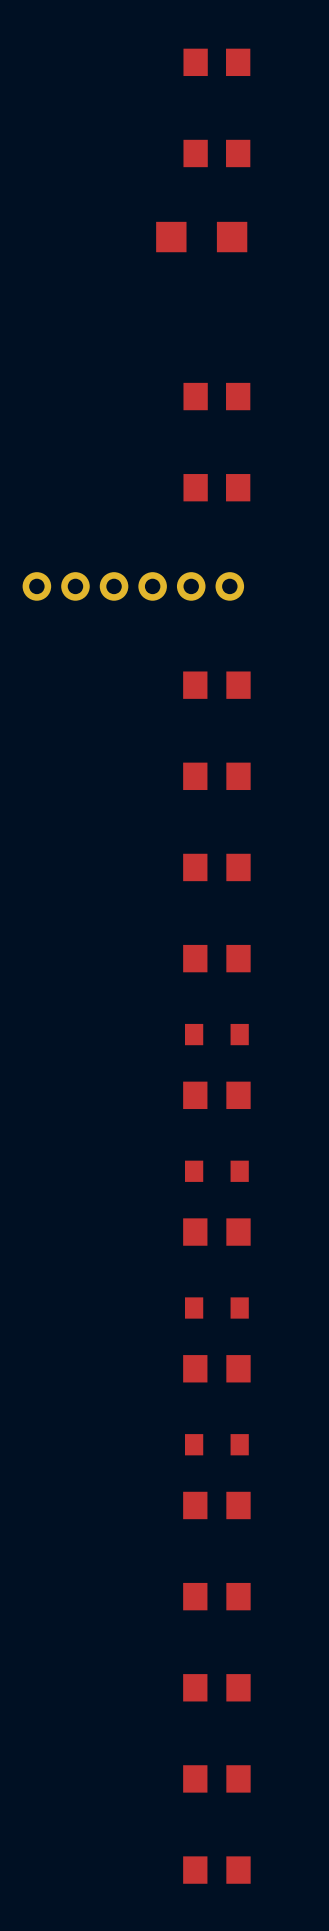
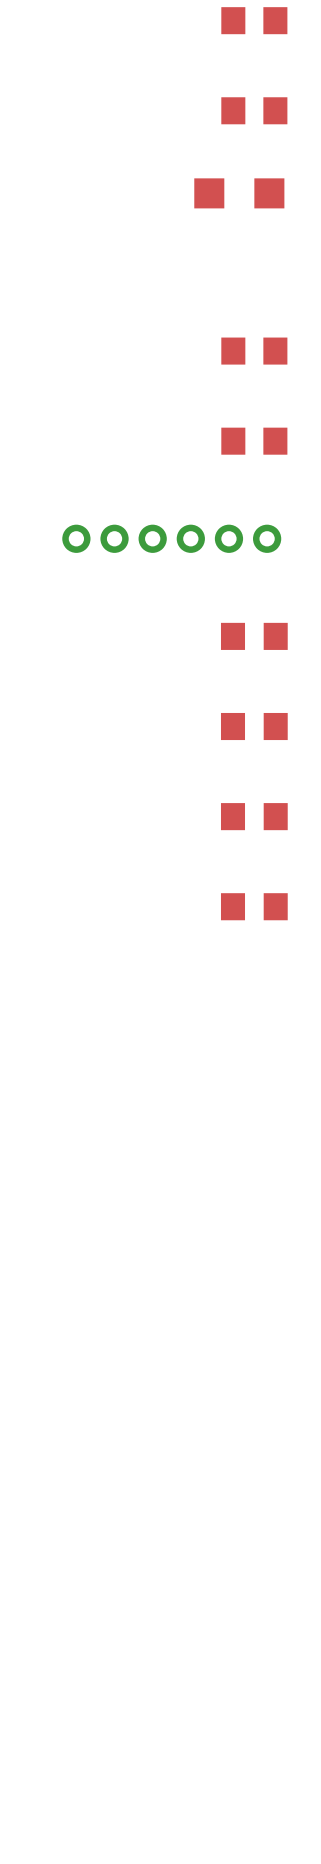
part: (216, 1034) -> none
part: (216, 1095) -> none
part: (216, 1171) -> none
part: (216, 1232) -> none
part: (216, 1308) -> none
part: (216, 1368) -> none
part: (216, 1444) -> none
part: (216, 1505) -> none
part: (216, 1596) -> none
part: (216, 1687) -> none
part: (216, 1778) -> none
part: (216, 1870) -> none

